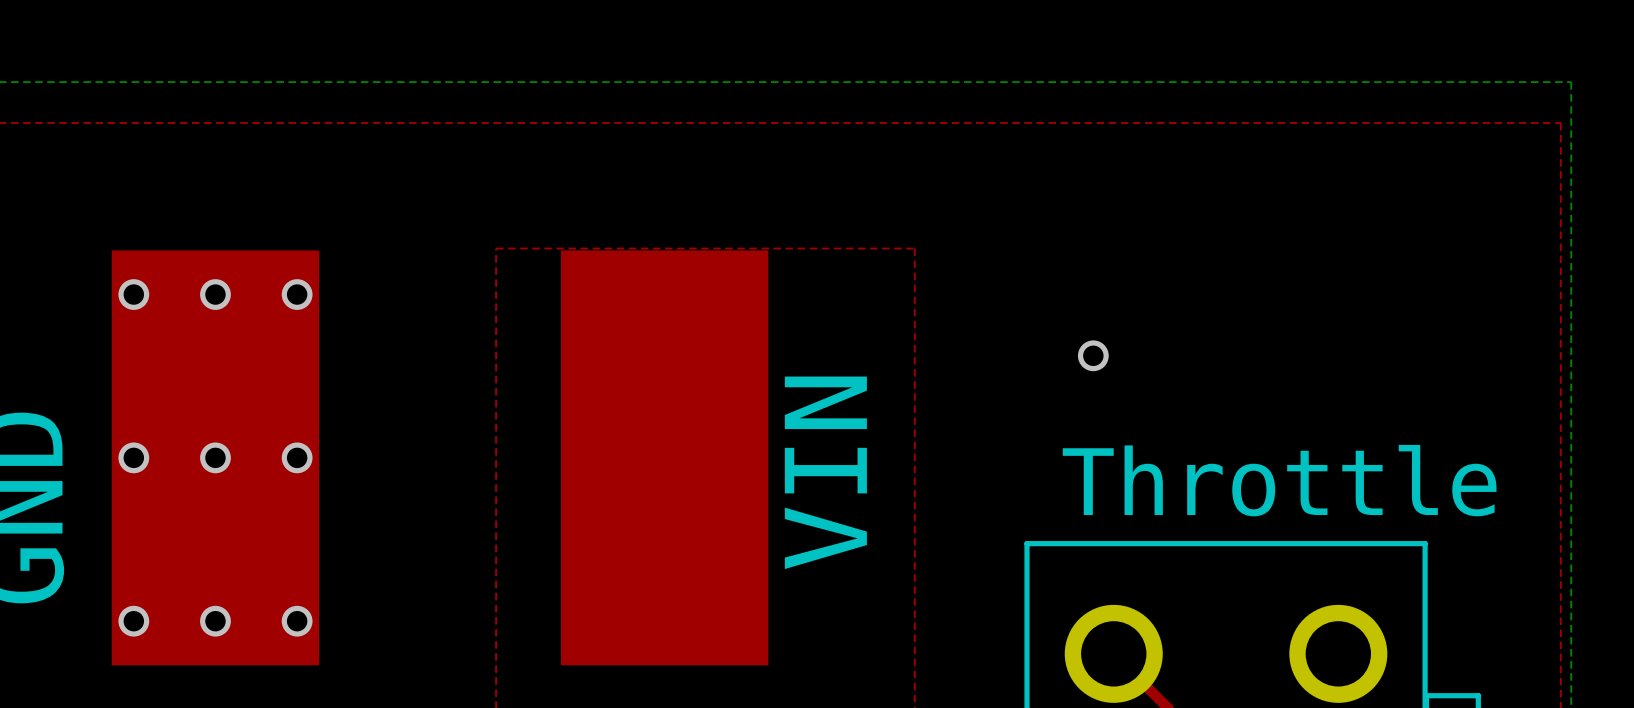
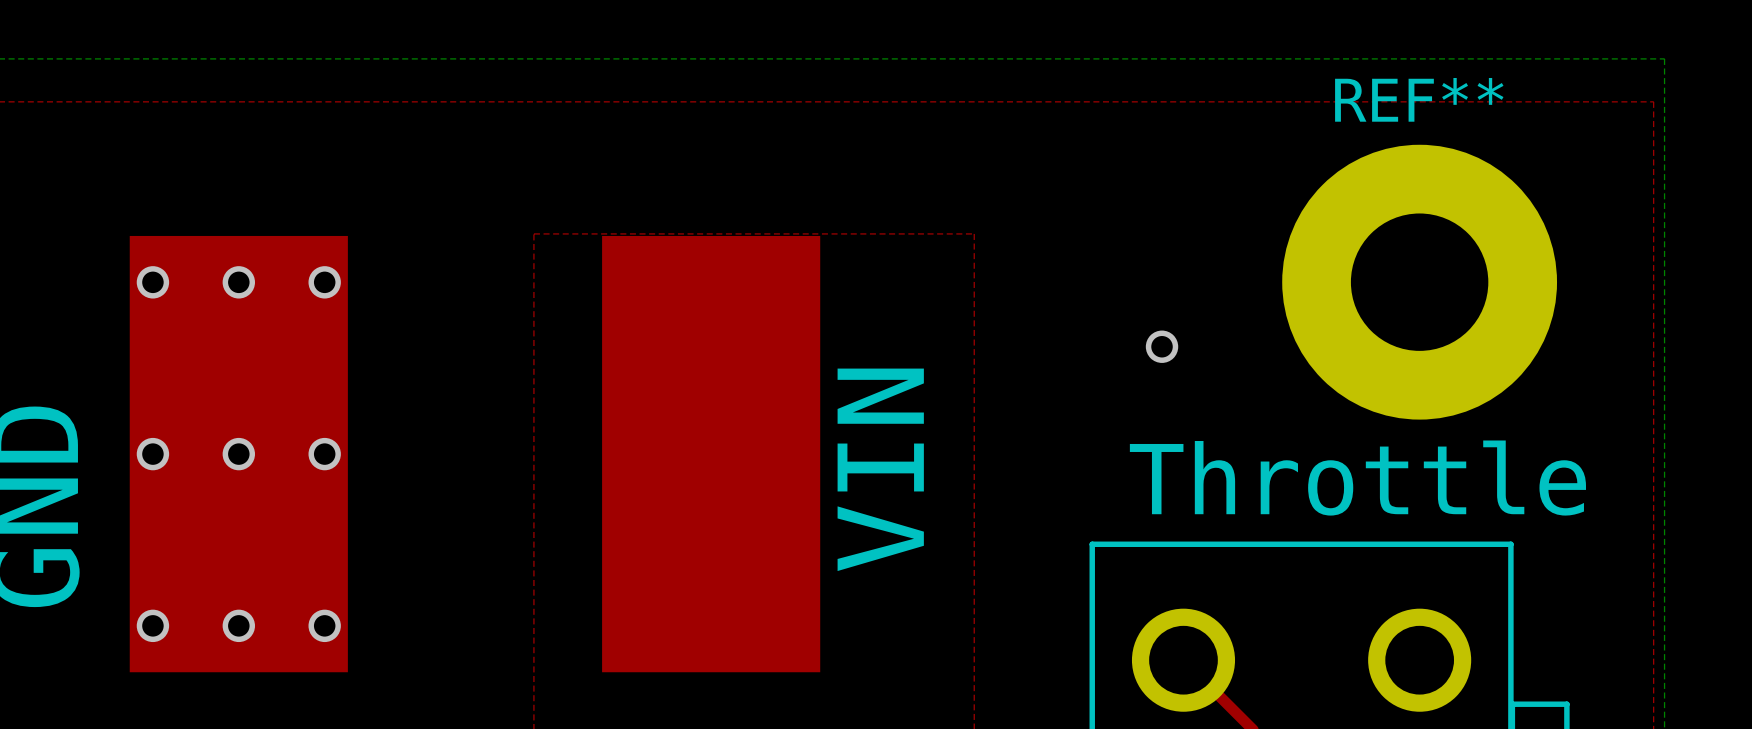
REF**: none -> (1419, 282)

